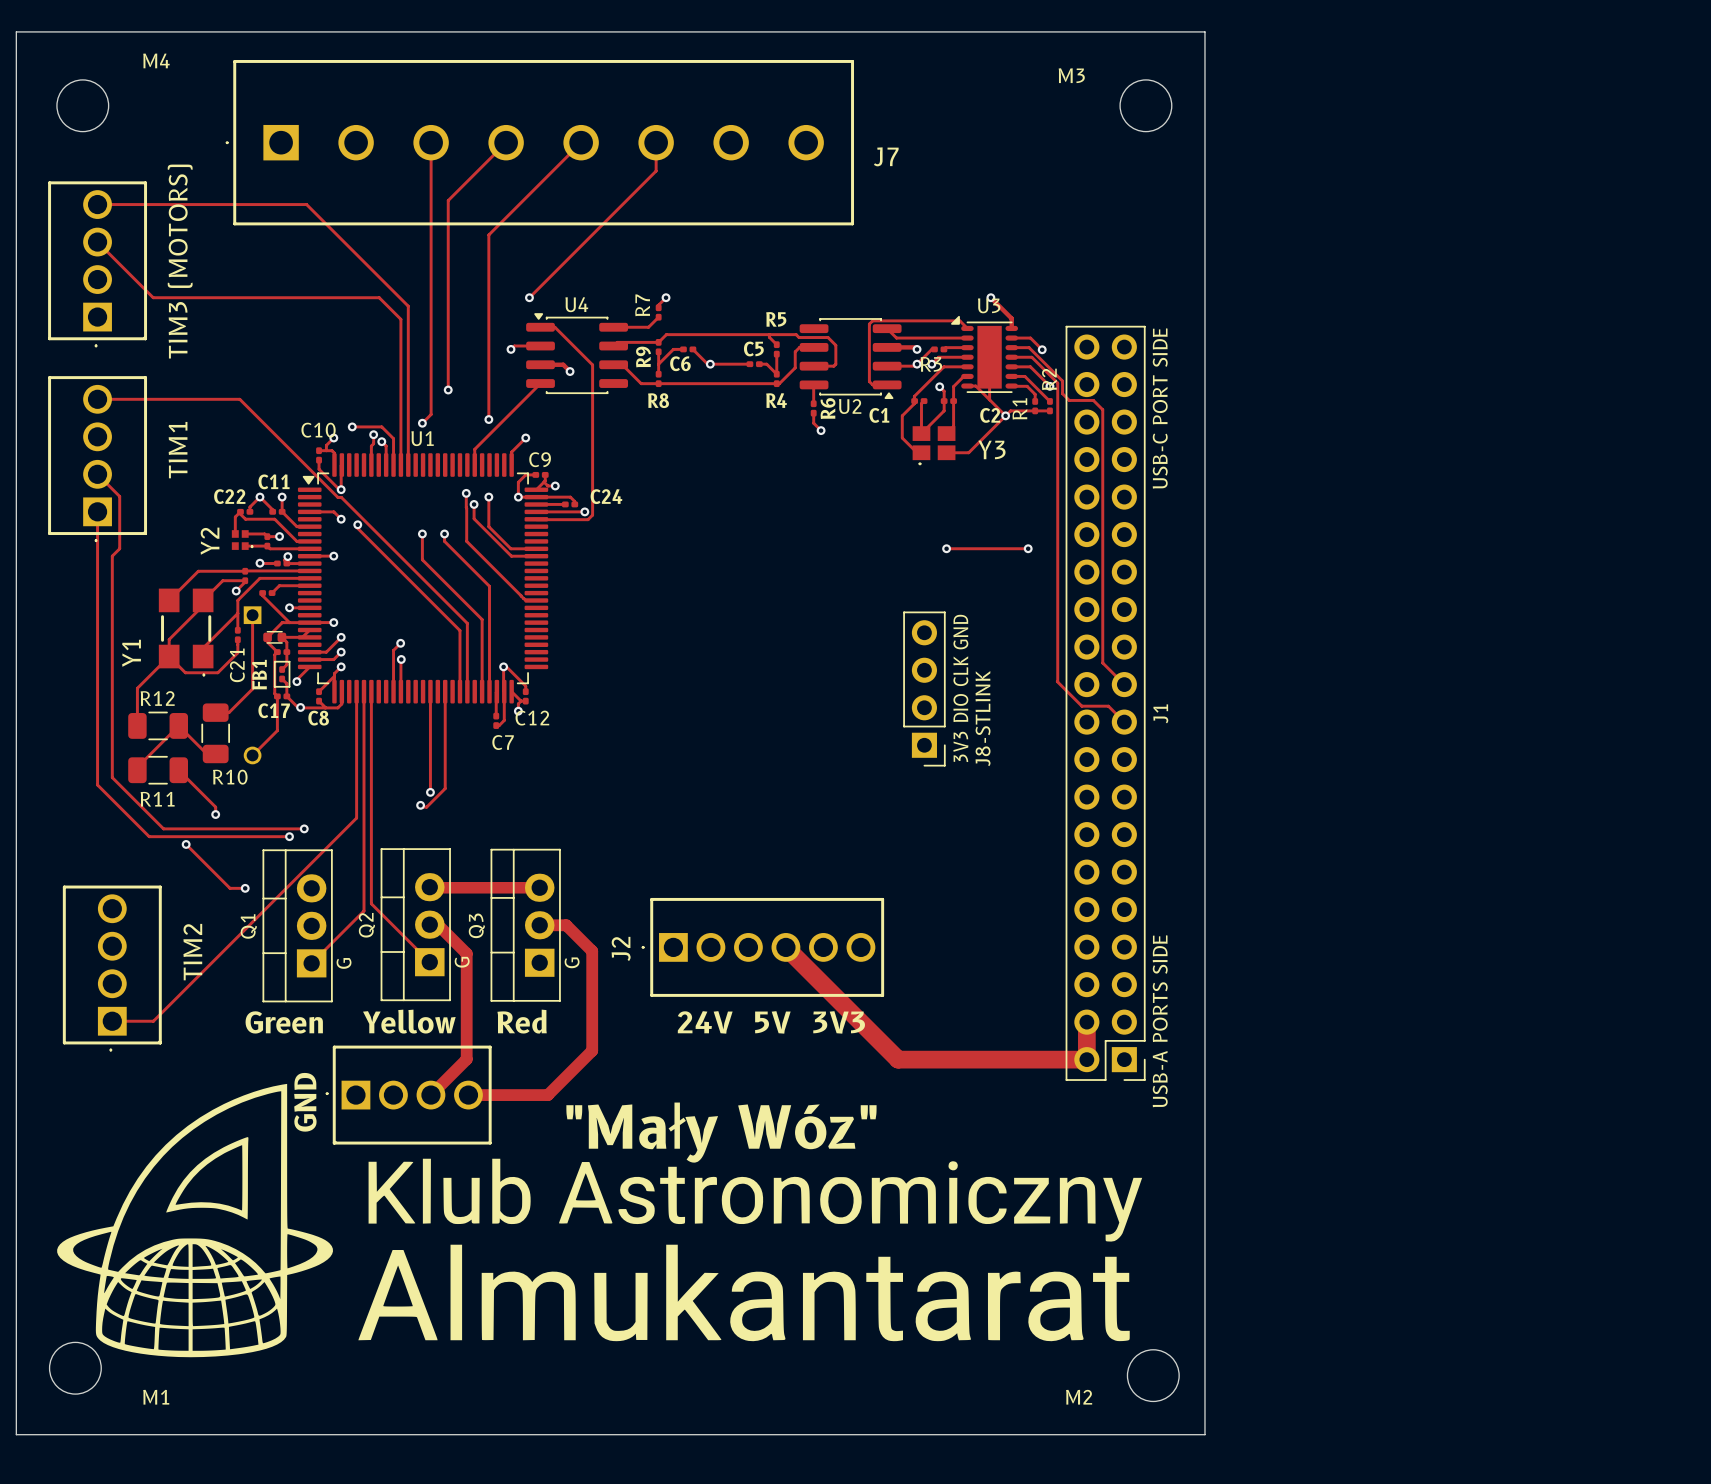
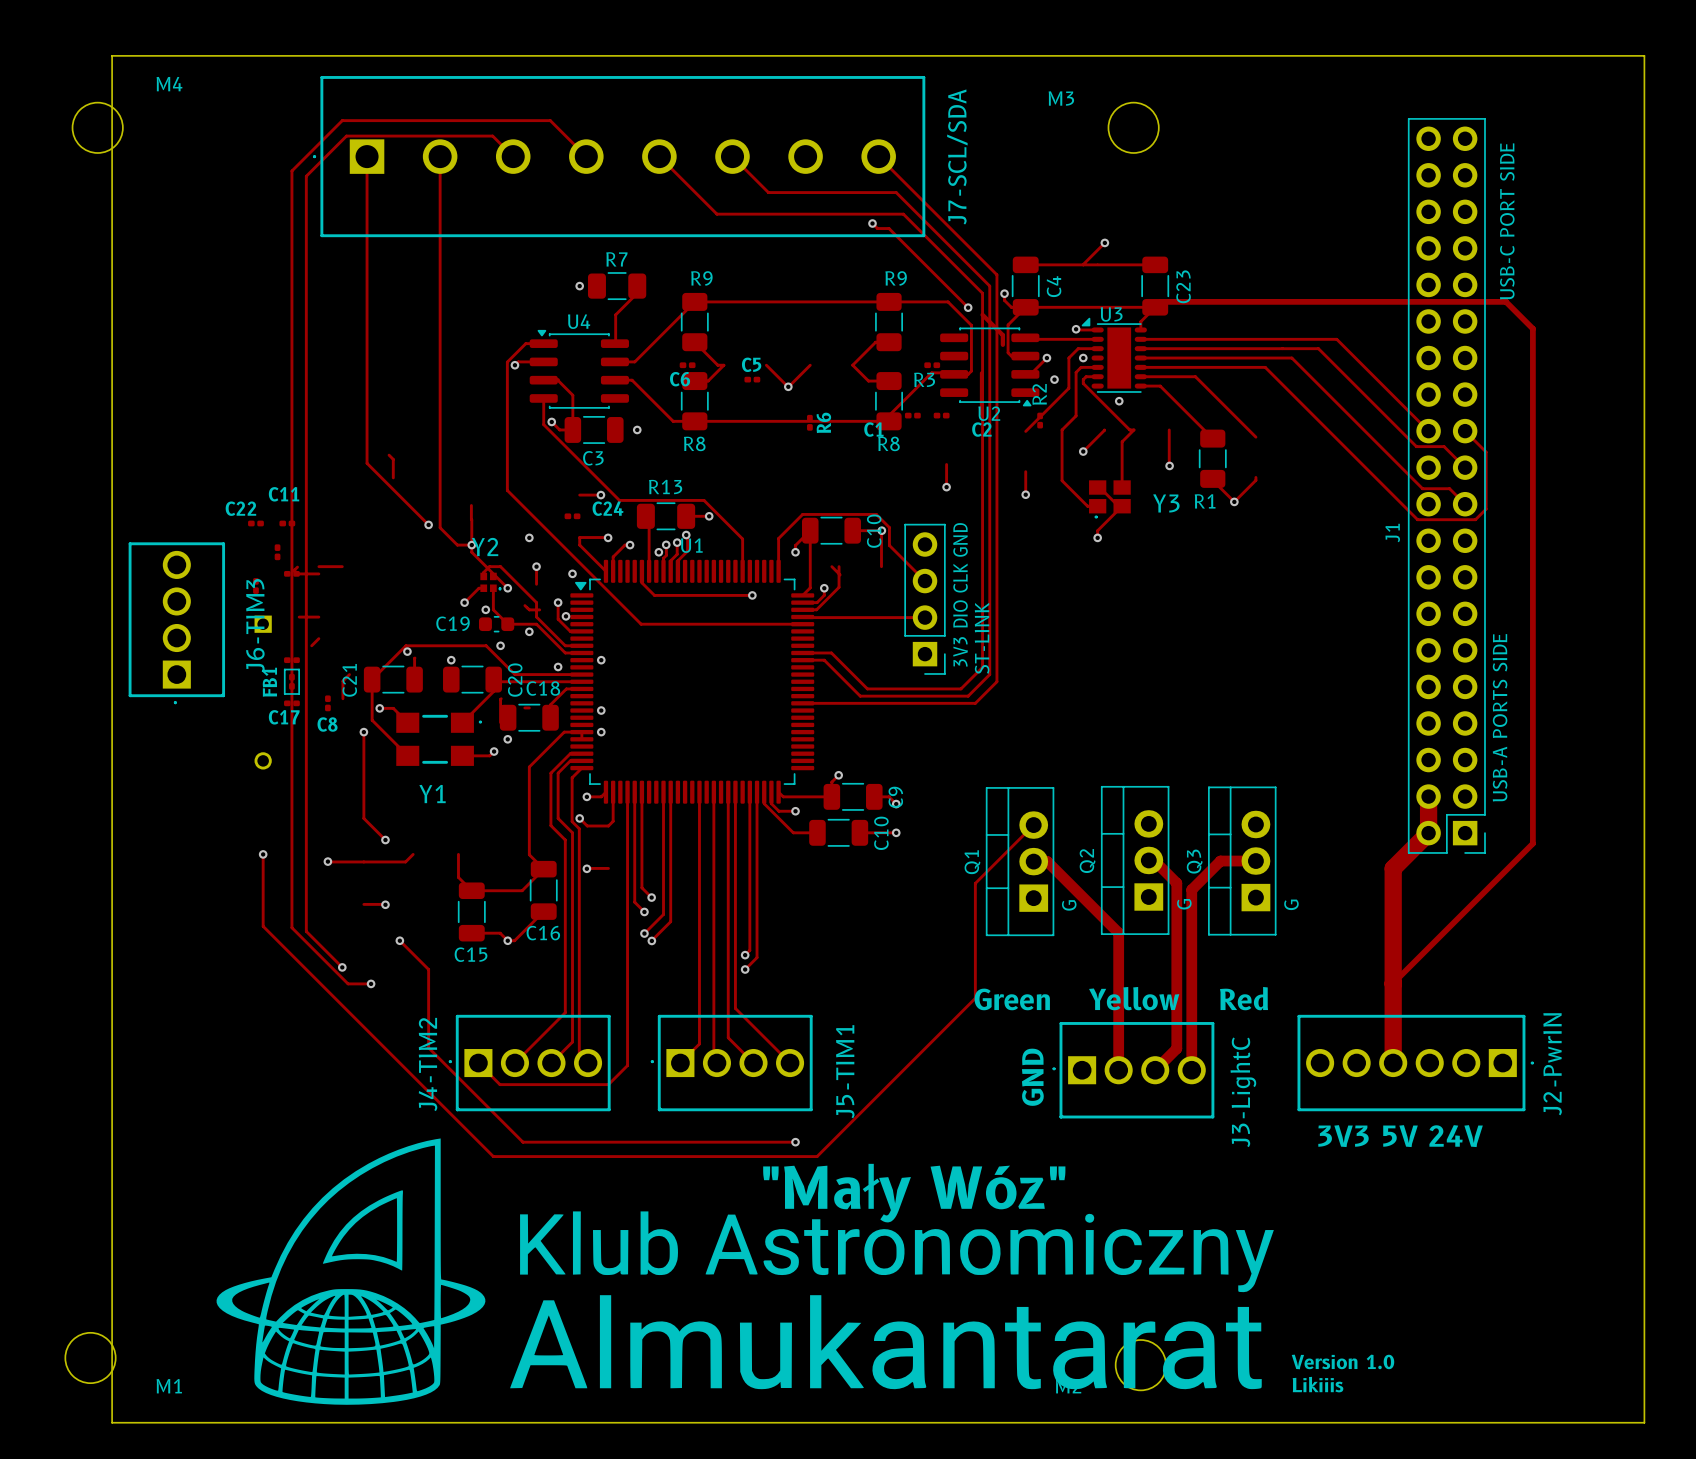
board edge: (97, 31) (16, 31) (16, 1434) (97, 1434) -> (112, 55) (112, 1422)
board edge: (1204, 31) (1204, 1434) -> (1191, 55) (1644, 55) (1644, 1422) (1191, 1422)
track: none -> (367, 156) (367, 463) (428, 524)
track: none -> (440, 156) (440, 527) (457, 545) (471, 545)
track: none -> (586, 156) (550, 120) (342, 120) (291, 170) (291, 509)
J7-SCL/SDA: none -> (619, 156)
track: none -> (659, 156) (716, 214) (903, 214) (982, 293) (982, 667) (960, 688) (867, 688) (831, 652) (802, 652)
track: none -> (732, 156) (768, 192) (896, 192) (989, 286) (989, 674) (968, 696) (860, 696) (824, 660) (802, 660)
track: none -> (878, 156) (996, 274) (996, 681) (975, 703) (802, 703)
track: (431, 142) (431, 414) (422, 423) -> none
track: (506, 142) (448, 200) (448, 390) -> none
J7: (539, 142) -> none
track: (581, 142) (488, 234) (488, 419) -> none
track: (656, 142) (656, 171) (529, 297) -> none
text: none -> USB-C PORT SIDE (1507, 221)
track: none -> (872, 223) (877, 228) (889, 228) (968, 307)
via: none -> (872, 223)
track: (97, 204) (306, 204) (408, 306) (408, 465) -> none
track: none -> (1104, 242) (1083, 264)
via: none -> (1104, 242)
track: (97, 242) (153, 297) (379, 297) (400, 319) (400, 465) -> none
track: none -> (1025, 264) (1097, 264)
track: none -> (1098, 264) (1155, 264)
text: TIM3 (MOTORS) (180, 261) -> none
part: (97, 264) -> none
via: none -> (579, 286)
C4: none -> (1025, 286)
C23: none -> (1155, 286)
track: none -> (1004, 293) (1004, 300) (1011, 307) (1155, 307)
via: none -> (1004, 293)
track: none -> (1025, 307) (1008, 324) (1008, 352) (1011, 356) (1025, 356)
track: none -> (1155, 307) (1140, 321) (1140, 329)
track: none -> (1155, 307) (1160, 301) (1506, 301) (1532, 328) (1532, 843) (1393, 983)
via: none -> (968, 307)
via: (529, 297) -> none
track: (666, 297) (658, 305) (658, 307) -> none
via: (666, 297) -> none
via: (990, 297) -> none
R7 footprint: [655, 304, 662, 321] -> [587, 272, 647, 301]
R9: none -> (694, 322)
R9: none -> (889, 322)
U3 name position: U3 (989, 305) -> U3 (1111, 314)
track: none -> (1076, 329) (1097, 329)
via: none -> (1076, 329)
track: (658, 317) (648, 327) (613, 327) -> (637, 286) (637, 293) (615, 314) (614, 343)
track: none -> (1025, 337) (1097, 339)
track: none -> (1140, 339) (1336, 339) (1428, 431)
track: none -> (694, 342) (717, 365) (723, 365) (708, 381) (694, 381)
track: none -> (889, 342) (875, 342) (852, 365) (868, 381) (889, 381)
track: (540, 327) (554, 327) (592, 364) (592, 515) (588, 519) (536, 519) -> (543, 343) (525, 343) (507, 362) (507, 490) (641, 624) (802, 624)
track: (887, 328) (896, 338) (967, 338) -> none
track: (967, 328) (959, 320) (872, 320) (869, 324) (869, 381) (872, 384) (887, 384) -> none
track: none -> (1097, 348) (1078, 348) (1068, 358) (1068, 388) (1025, 431)
track: none -> (1140, 348) (1318, 348) (1416, 446) (1444, 446) (1465, 467)
track: (769, 334) (769, 337) (776, 344) -> none
track: (1011, 338) (1030, 338) (1042, 349) -> none
track: none -> (1046, 358) (1030, 374) (1025, 374)
via: none -> (1046, 358)
via: none -> (1083, 358)
track: none -> (1140, 358) (1291, 358) (1422, 488) (1449, 488) (1465, 504)
track: (613, 346) (617, 342) (658, 342) (666, 334) (796, 334) (799, 337) (828, 337) (835, 345) (835, 364) (833, 366) (814, 366) -> (614, 361) (634, 361) (694, 301) (948, 301) (971, 325) (971, 371) (968, 374) (954, 374)
R9: (658, 347) -> none
track: (814, 347) (799, 347) (795, 351) (795, 367) (779, 383) (641, 383) (622, 364) -> (925, 379) (889, 415) (889, 421) (673, 421) (632, 380) (623, 380)
track: (887, 347) (915, 347) (917, 349) -> none
track: (967, 347) (945, 347) (943, 349) -> none
track: (1011, 347) (1029, 347) (1062, 381) (1062, 393) (1069, 400) (1093, 400) (1102, 409) (1102, 662) (1124, 684) -> none
track: (683, 349) (673, 349) (658, 364) -> none
track: (692, 349) (707, 364) (749, 364) -> none
track: none -> (766, 365) (787, 386) (810, 365)
R5: (776, 349) -> none
via: (917, 349) -> none
track: (934, 349) (931, 349) (915, 366) (887, 366) -> none
via: (1042, 349) -> none
track: (658, 351) (658, 374) -> none
track: none -> (1097, 367) (1081, 367) (1076, 372) (1076, 415) (1062, 429) (1062, 480) (1087, 506) (1097, 506)
track: none -> (1140, 367) (1265, 367) (1417, 519) (1475, 519) (1486, 509) (1486, 452) (1465, 431)
track: (776, 354) (776, 374) (766, 364) (759, 364) -> none
U3 position: (984, 354) -> (1114, 355)
track: (1011, 357) (1031, 357) (1057, 383) (1057, 681) (1081, 706) (1108, 706) (1124, 722) -> none
U2 position: (850, 358) -> (989, 366)
track: none -> (1097, 376) (1086, 376) (1083, 379) (1083, 383) (1129, 429) (1133, 429) (1122, 441) (1122, 487)
track: none -> (1140, 376) (1195, 376) (1255, 437)
track: (554, 364) (563, 364) (570, 371) -> (557, 380) (572, 395) (572, 429) (559, 429) (551, 421)
via: (710, 364) -> none
via: (917, 364) -> none
via: (931, 364) -> none
via: none -> (1054, 379)
track: (967, 366) (943, 366) (914, 396) (914, 403) (902, 415) (902, 438) (917, 452) (921, 452) -> none
track: (1011, 366) (1030, 366) (1049, 386) -> none
track: none -> (1140, 386) (1160, 386) (1212, 438)
via: (570, 371) -> none
via: none -> (788, 386)
track: (967, 376) (963, 376) (953, 386) (953, 426) (946, 433) -> none
track: (1011, 376) (1024, 376) (1049, 401) -> none
R8: (658, 378) -> none
R4: (776, 378) -> none
track: (540, 383) (474, 449) (474, 465) -> (543, 398) (543, 424) (619, 500) (704, 500) (742, 539) (742, 571)
track: (814, 384) (813, 403) -> none
R8: none -> (694, 401)
R8: none -> (889, 401)
track: (939, 386) (944, 391) (944, 410) (921, 433) (921, 403) (924, 401) -> none
via: (939, 386) -> none
track: (967, 386) (975, 386) (1005, 415) -> none
track: (1011, 386) (1027, 386) (1035, 394) (1035, 401) -> none
via: (1049, 386) -> none
via: none -> (1119, 401)
via: (448, 390) -> none
R1 footprint: [1032, 398, 1039, 415] -> [1198, 429, 1227, 488]
track: (97, 399) (239, 399) (467, 623) (467, 691) -> none
via: none -> (551, 421)
R1 name position: R1 (1019, 408) -> R1 (1205, 501)
text: USB-C PORT SIDE (1160, 408) -> none
track: (1049, 410) (1010, 410) (968, 452) (946, 452) -> none
track: (813, 413) (813, 423) (821, 430) -> none
C3: none -> (594, 429)
via: none -> (637, 429)
via: (1005, 415) -> none
track: none -> (1104, 429) (1083, 451)
track: none -> (1169, 429) (1169, 465)
via: (488, 419) -> none
via: (422, 423) -> none
track: (352, 426) (381, 426) (393, 438) (393, 465) -> none
via: (352, 426) -> none
via: (821, 430) -> none
track: (373, 434) (371, 465) -> none
via: (373, 434) -> none
track: (333, 438) (326, 445) (326, 450) -> none
via: (333, 438) -> none
track: (525, 438) (511, 452) (511, 465) -> none
via: (525, 438) -> none
via: none -> (1083, 451)
via: (381, 441) -> none
Y3 position: (934, 445) -> (1109, 499)
text: TIM1 (178, 450) -> none
track: (319, 450) (331, 450) (334, 453) (334, 465) -> none
track: none -> (946, 464) (946, 487)
via: none -> (1169, 465)
C10: (319, 455) -> none
track: none -> (1025, 471) (1025, 494)
part: (97, 459) -> none
C9 name position: C9 (540, 459) -> C9 (895, 797)
track: (319, 460) (319, 469) (339, 489) (341, 489) (341, 465) -> none
track: none -> (1255, 477) (1255, 480) (1234, 501) (1212, 478)
C9 footprint: [532, 471, 549, 478] -> [823, 782, 883, 811]
track: (97, 474) (119, 496) (119, 548) (112, 556) (112, 777) (163, 828) (304, 828) -> none
track: (535, 474) (525, 474) (518, 482) (518, 497) (570, 497) (574, 501) (574, 504) -> none
track: (545, 474) (545, 480) (536, 489) -> none
via: none -> (946, 487)
track: none -> (1097, 487) (1118, 506) (1122, 506) (1097, 530) (1097, 537)
track: (544, 482) (547, 485) (555, 485) -> none
track: none -> (601, 494) (579, 495)
via: none -> (600, 495)
via: none -> (1025, 494)
via: (555, 485) -> none
via: (341, 489) -> none
via: none -> (1234, 501)
via: (466, 493) -> none
via: (259, 497) -> none
via: (282, 497) -> none
track: (488, 497) (488, 526) (510, 548) (536, 548) -> none
via: (488, 497) -> none
via: (518, 497) -> none
track: (474, 504) (474, 518) (511, 556) (536, 556) -> none
via: (474, 504) -> none
track: (536, 504) (565, 504) -> none
track: none -> (645, 516) (649, 519) (649, 571)
R13: none -> (666, 516)
track: none -> (686, 516) (709, 516)
via: none -> (709, 516)
track: (97, 511) (97, 784) (149, 836) (289, 836) -> none
track: (249, 511) (249, 507) (259, 497) (272, 511) -> none
track: (282, 511) (296, 526) (309, 526) -> (291, 523) (291, 927) (348, 983) (371, 983)
track: (309, 511) (333, 511) (341, 519) -> none
track: (536, 511) (584, 511) -> none
via: (584, 511) -> none
via: none -> (428, 524)
via: (341, 519) -> none
C10: none -> (831, 530)
track: none -> (852, 530) (881, 530) (881, 566)
via: none -> (881, 530)
track: none -> (686, 535) (687, 551) (677, 560) (677, 571)
via: none -> (686, 535)
track: (357, 524) (355, 526) (459, 630) (459, 691) -> none
via: (357, 524) -> none
via: none -> (529, 537)
track: none -> (608, 537) (579, 537) (579, 545) (605, 571)
via: none -> (608, 537)
via: none -> (1097, 537)
track: none -> (677, 542) (677, 554) (670, 560) (670, 571)
via: none -> (677, 542)
track: (235, 533) (235, 516) (240, 511) (245, 519) (274, 519) (296, 541) (309, 541) -> none
track: (245, 533) (264, 533) (267, 536) (279, 536) -> none
track: (422, 533) (422, 559) (482, 619) (482, 691) -> none
via: (422, 533) -> none
track: (444, 533) (444, 541) (489, 586) (489, 691) -> none
via: (444, 533) -> none
via: none -> (471, 545)
track: none -> (630, 545) (625, 545) (613, 556) (613, 571)
via: none -> (630, 545)
track: none -> (666, 545) (663, 571)
via: none -> (666, 544)
via: (279, 536) -> none
Y2 position: (242, 540) -> (490, 582)
Y2 name rotation: 0° (210, 541) -> 90° clockwise (485, 546)
via: none -> (658, 552)
track: none -> (795, 552) (795, 545) (810, 530) (810, 587) (802, 595)
via: none -> (795, 552)
track: (245, 546) (267, 546) (270, 548) (309, 548) -> none
track: (946, 548) (1028, 548) -> none
via: (946, 548) -> none
via: (1028, 548) -> none
via: (287, 556) -> none
via: (333, 556) -> none
track: none -> (536, 566) (536, 584)
via: none -> (536, 566)
track: none -> (831, 566) (840, 574)
track: none -> (839, 566) (839, 587) (816, 609) (802, 609)
track: none -> (641, 571) (641, 582) (654, 595) (752, 595)
track: none -> (778, 571) (778, 538) (802, 514) (876, 514) (889, 527) (889, 545) (925, 581)
track: (259, 563) (277, 563) -> none
via: (259, 563) -> none
via: none -> (572, 573)
track: none -> (483, 576) (483, 572) (489, 566) (500, 566) (536, 602) (536, 617) (565, 645) (581, 645)
track: (309, 570) (198, 571) (168, 599) -> none
track: (309, 578) (259, 578) (237, 600) (237, 630) -> none
U1 position: (423, 578) -> (692, 681)
track: none -> (483, 588) (478, 588) (464, 602)
track: none -> (493, 588) (493, 609) (507, 624) (536, 624) (565, 652) (581, 652)
track: (503, 578) (521, 595) -> none
via: none -> (507, 588)
track: none -> (824, 588) (824, 595) (817, 602) (802, 602)
via: none -> (824, 588)
track: (309, 585) (279, 585) (272, 593) -> none
via: none -> (752, 595)
ST-LINK: none -> (925, 599)
track: (236, 591) (245, 580) (222, 580) (203, 600) (203, 605) (169, 639) (169, 656) -> none
via: (236, 591) -> none
track: (262, 593) (262, 595) (289, 622) -> none
part: (267, 593) -> none
via: none -> (464, 602)
track: none -> (558, 602) (558, 619) (570, 631) (581, 631)
via: none -> (558, 602)
via: none -> (485, 609)
via: (289, 607) -> none
via: none -> (566, 616)
track: none -> (802, 617) (925, 617)
track: (237, 613) (203, 648) (203, 656) -> none
J6-TIM3: none -> (176, 623)
track: (252, 615) (252, 689) (228, 712) (215, 712) -> none
C19: none -> (496, 624)
track: (333, 622) (282, 622) (267, 637) (267, 642) (277, 652) (274, 654) (277, 730) (252, 755) -> none
via: (333, 622) -> none
via: none -> (529, 631)
C21 footprint: [234, 626, 241, 644] -> [363, 665, 423, 694]
Y1 rotation: 0° (186, 632) -> 90° counterclockwise (439, 739)
Y1 position: (186, 632) -> (439, 739)
part: (274, 637) -> none
track: (309, 637) (281, 637) (286, 642) (286, 664) (282, 669) -> none
track: (341, 637) (326, 652) (309, 652) -> none
via: (341, 637) -> none
via: none -> (500, 645)
track: (237, 639) (237, 652) (217, 672) (185, 672) (169, 656) -> none
track: (400, 643) (393, 650) (393, 691) -> none
track: none -> (414, 658) (414, 679)
track: (341, 652) (333, 659) (309, 659) -> none
via: (341, 652) -> none
via: none -> (451, 660)
via: none -> (601, 660)
track: (169, 656) (137, 688) (137, 725) -> none
track: (401, 659) (400, 691) -> none
via: (401, 659) -> none
via: none -> (558, 666)
C21 name position: C21 (237, 665) -> C21 (349, 680)
track: (309, 666) (296, 679) -> (513, 156) (492, 136) (346, 136) (306, 176) (306, 687)
via: (341, 666) -> none
via: (503, 666) -> none
track: none -> (581, 674) (514, 674) (486, 645) (405, 645) (372, 679) (372, 720) (407, 755)
C20: none -> (472, 679)
track: none -> (581, 681) (495, 681) (493, 679) (493, 691) (462, 722)
track: (334, 676) (319, 691) -> none
track: (282, 678) (286, 683) (286, 696) (297, 707) (325, 707) -> none
track: none -> (306, 688) (306, 931) (342, 967)
via: (296, 681) -> none
track: none -> (581, 688) (566, 688) (550, 704) (550, 717)
text position: 3V3 DIO CLK GND (960, 688) -> 3V3 DIO CLK GND (960, 594)
J8-STLINK: (924, 689) -> none
track: (341, 691) (341, 703) (337, 707) (325, 707) (319, 701) -> none
track: (356, 691) (356, 818) (153, 1021) (112, 1021) -> none
track: (364, 691) (364, 911) (311, 963) -> none
track: (371, 691) (371, 903) (429, 962) -> none
track: (430, 691) (430, 792) -> none
track: (445, 691) (445, 788) (426, 807) (420, 805) -> none
track: (511, 691) (521, 701) (518, 703) (518, 711) -> none
track: (525, 691) (525, 686) (506, 666) (503, 666) (504, 720) (499, 725) (496, 725) -> none
C12: (525, 696) -> none
track: none -> (379, 708) (393, 708) (407, 722)
via: none -> (379, 708)
via: none -> (601, 710)
J1 position: (1105, 703) -> (1446, 485)
via: (300, 707) -> none
via: (518, 711) -> none
C18: none -> (529, 717)
text: none -> USB-A PORTS SIDE (1500, 717)
J1 name position: J1 (1160, 713) -> J1 (1392, 533)
C7: (496, 720) -> none
R12: (158, 725) -> none
track: none -> (363, 732) (363, 818) (385, 840)
via: none -> (363, 732)
via: none -> (601, 732)
R10: (215, 733) -> none
via: none -> (507, 739)
track: none -> (581, 739) (581, 732) (564, 732) (529, 767) (529, 854) (543, 869) (522, 890) (471, 890) (458, 877) (458, 854)
track: none -> (494, 751) (489, 755) (462, 755)
via: none -> (494, 751)
track: none -> (581, 753) (570, 753) (550, 773) (550, 825) (565, 840) (565, 1012) (514, 1063)
track: (215, 753) (206, 753) (178, 725) (137, 767) (137, 770) -> none
track: none -> (581, 760) (570, 760) (558, 773) (558, 818) (572, 832) (572, 1042) (551, 1063)
track: none -> (581, 768) (572, 777) (572, 821) (579, 828) (579, 1054) (588, 1063)
R11: (158, 770) -> none
track: (178, 770) (215, 807) (215, 814) -> none
track: none -> (838, 775) (831, 782) (831, 796) (783, 796) (778, 792)
via: none -> (838, 775)
track: none -> (605, 792) (601, 796) (586, 796)
track: none -> (613, 792) (613, 821) (608, 826) (587, 826) (579, 818)
track: none -> (627, 792) (627, 1065) (608, 1084) (499, 1084) (478, 1063)
track: none -> (634, 792) (634, 902) (644, 911)
track: none -> (641, 792) (641, 887) (651, 897)
track: none -> (663, 792) (663, 914) (644, 933)
track: none -> (670, 792) (670, 921) (651, 940)
track: none -> (699, 792) (699, 1043) (680, 1063)
track: none -> (713, 792) (713, 1059) (716, 1063)
track: none -> (728, 792) (728, 1037) (753, 1063)
track: none -> (735, 792) (735, 1008) (790, 1063)
track: none -> (749, 792) (749, 950) (745, 955)
track: none -> (757, 792) (757, 957) (745, 969)
track: none -> (764, 792) (764, 803) (793, 832) (817, 832)
track: none -> (771, 792) (771, 803) (778, 811) (795, 811)
via: (430, 792) -> none
via: none -> (586, 796)
track: none -> (874, 796) (889, 796) (896, 804)
track: none -> (1428, 796) (1428, 833) (1393, 868) (1393, 1063)
via: none -> (896, 804)
via: (420, 805) -> none
via: none -> (795, 811)
via: (215, 814) -> none
via: none -> (579, 818)
track: none -> (1033, 825) (975, 883) (975, 998) (817, 1156) (493, 1156) (263, 926) (263, 854)
via: (304, 828) -> none
C10: none -> (838, 832)
track: none -> (859, 832) (896, 832)
via: none -> (896, 832)
via: (289, 836) -> none
via: none -> (385, 840)
track: (186, 844) (230, 888) (245, 888) -> none
via: (186, 844) -> none
via: none -> (263, 854)
track: none -> (413, 854) (405, 861) (327, 861)
track: none -> (1148, 860) (1154, 860) (1176, 883) (1176, 1048) (1155, 1070)
via: none -> (327, 861)
track: none -> (1033, 861) (1047, 861) (1118, 932) (1118, 1070)
track: none -> (1255, 861) (1220, 861) (1191, 889) (1191, 1070)
track: none -> (608, 868) (586, 868)
via: none -> (586, 868)
track: (429, 887) (539, 887) -> none
via: (245, 888) -> none
C16: none -> (543, 890)
via: none -> (651, 897)
track: none -> (363, 904) (385, 904)
text: none -> G (1184, 904)
via: none -> (385, 904)
text: none -> G (1069, 905)
text: none -> G (1291, 904)
C15: none -> (471, 911)
track: none -> (543, 911) (514, 940) (507, 940) (500, 933) (471, 933)
via: none -> (644, 911)
Q2 position: (415, 924) -> (1135, 860)
track: (429, 924) (437, 924) (466, 953) (466, 1059) (430, 1095) -> none
Q1 position: (297, 925) -> (1020, 861)
Q3 position: (525, 925) -> (1242, 861)
track: (539, 925) (566, 925) (592, 951) (592, 1050) (547, 1095) (468, 1095) -> none
via: none -> (644, 933)
track: none -> (399, 940) (428, 969) (428, 1047) (522, 1142) (795, 1142)
via: none -> (399, 940)
via: none -> (507, 940)
via: none -> (651, 940)
J2: (762, 947) -> none
track: (785, 947) (898, 1059) (1086, 1059) (1086, 1022) -> none
text: TIM2 (192, 952) -> none
via: none -> (745, 955)
text: G (462, 962) -> none
text: G (572, 962) -> none
text: G (344, 963) -> none
via: none -> (342, 967)
part: (112, 968) -> none
via: none -> (745, 969)
via: none -> (371, 983)
text: none -> Yellow (1134, 998)
text: none -> Red (1244, 998)
text: none -> Green (1012, 999)
text: Yellow (409, 1021) -> none
text: Red (522, 1021) -> none
text: USB-A PORTS SIDE (1160, 1021) -> none
text: Green (284, 1022) -> none
text: 24V 5V 3V3 (771, 1022) -> none
J4-TIM2: none -> (529, 1063)
J5-TIM1: none -> (731, 1063)
J2-PwrIN: none -> (1415, 1063)
J3-LightC: none -> (1133, 1070)
text: none -> GND (1032, 1077)
part: (408, 1095) -> none
text: GND (305, 1102) -> none
text position: "Mały Wóz" (721, 1132) -> "Mały Wóz" (914, 1193)
text: none -> 3V3 5V 24V (1400, 1136)
via: none -> (795, 1142)
drawing position: (599, 1220) -> (745, 1271)
text: none -> Version 1.0 (1342, 1361)
text: none -> Likiiis (1318, 1384)

